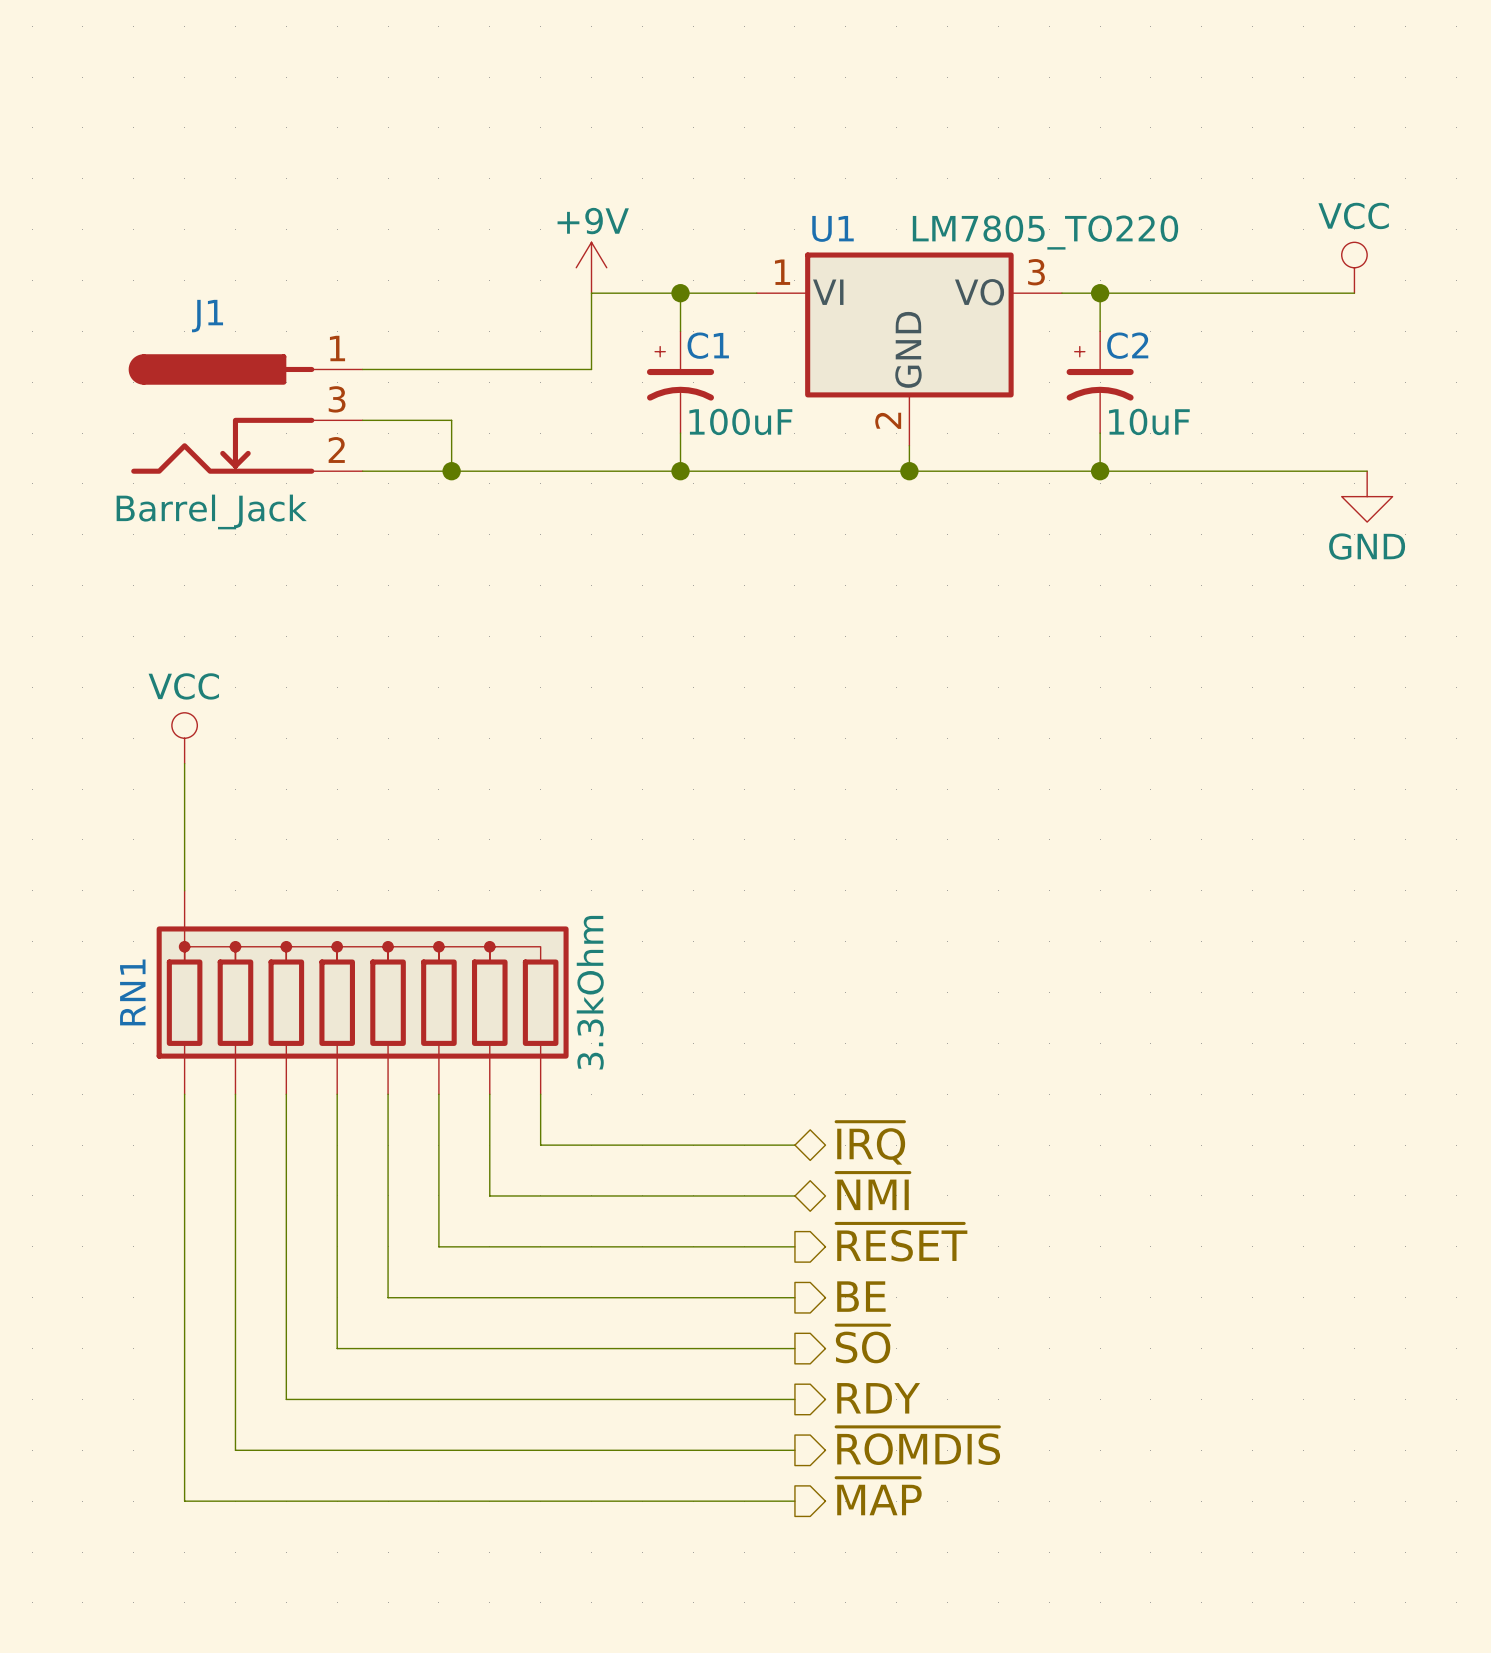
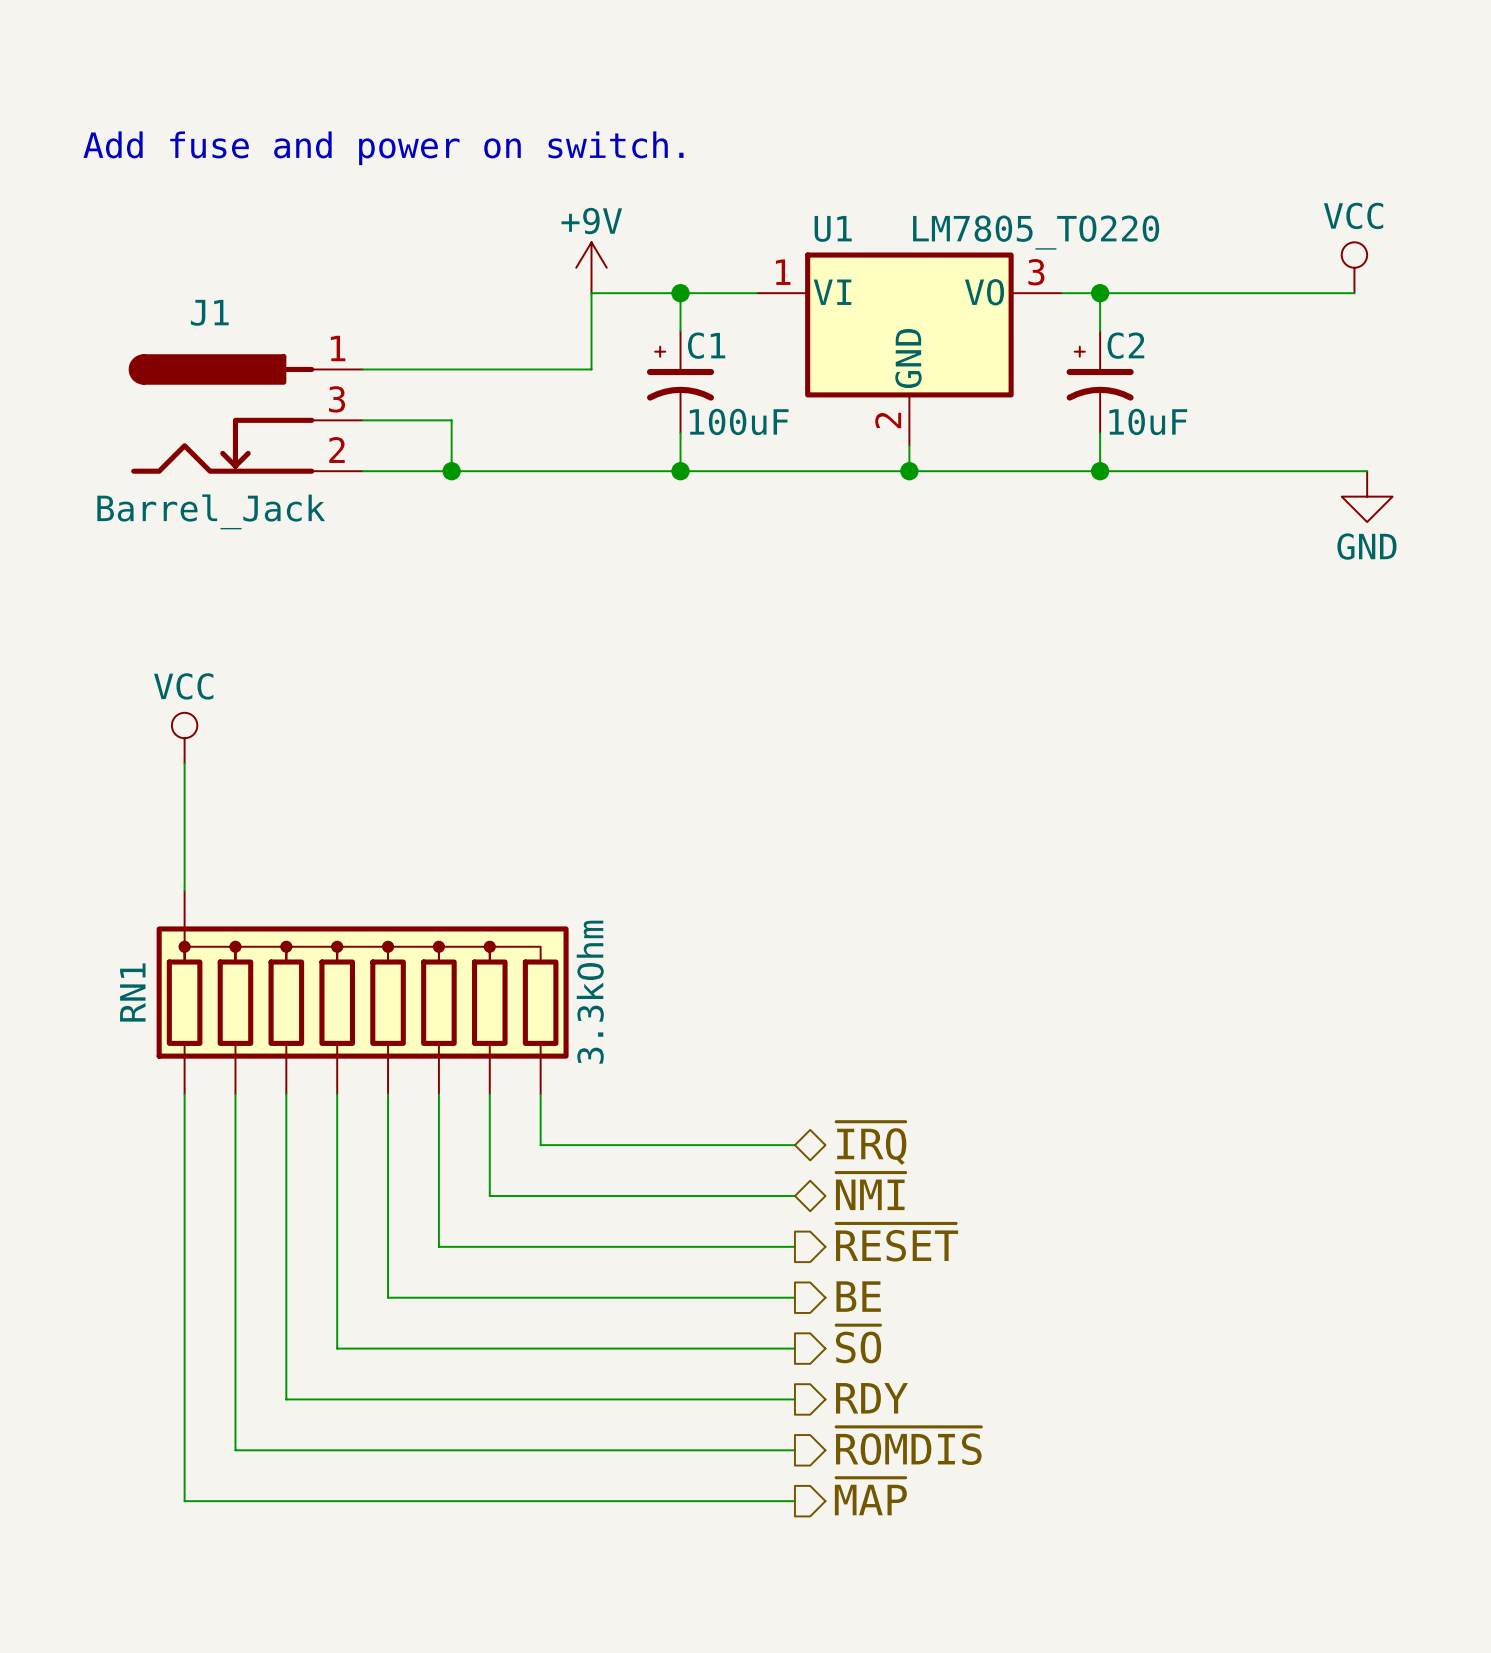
text: none -> Add fuse and power on switch. (383, 148)

